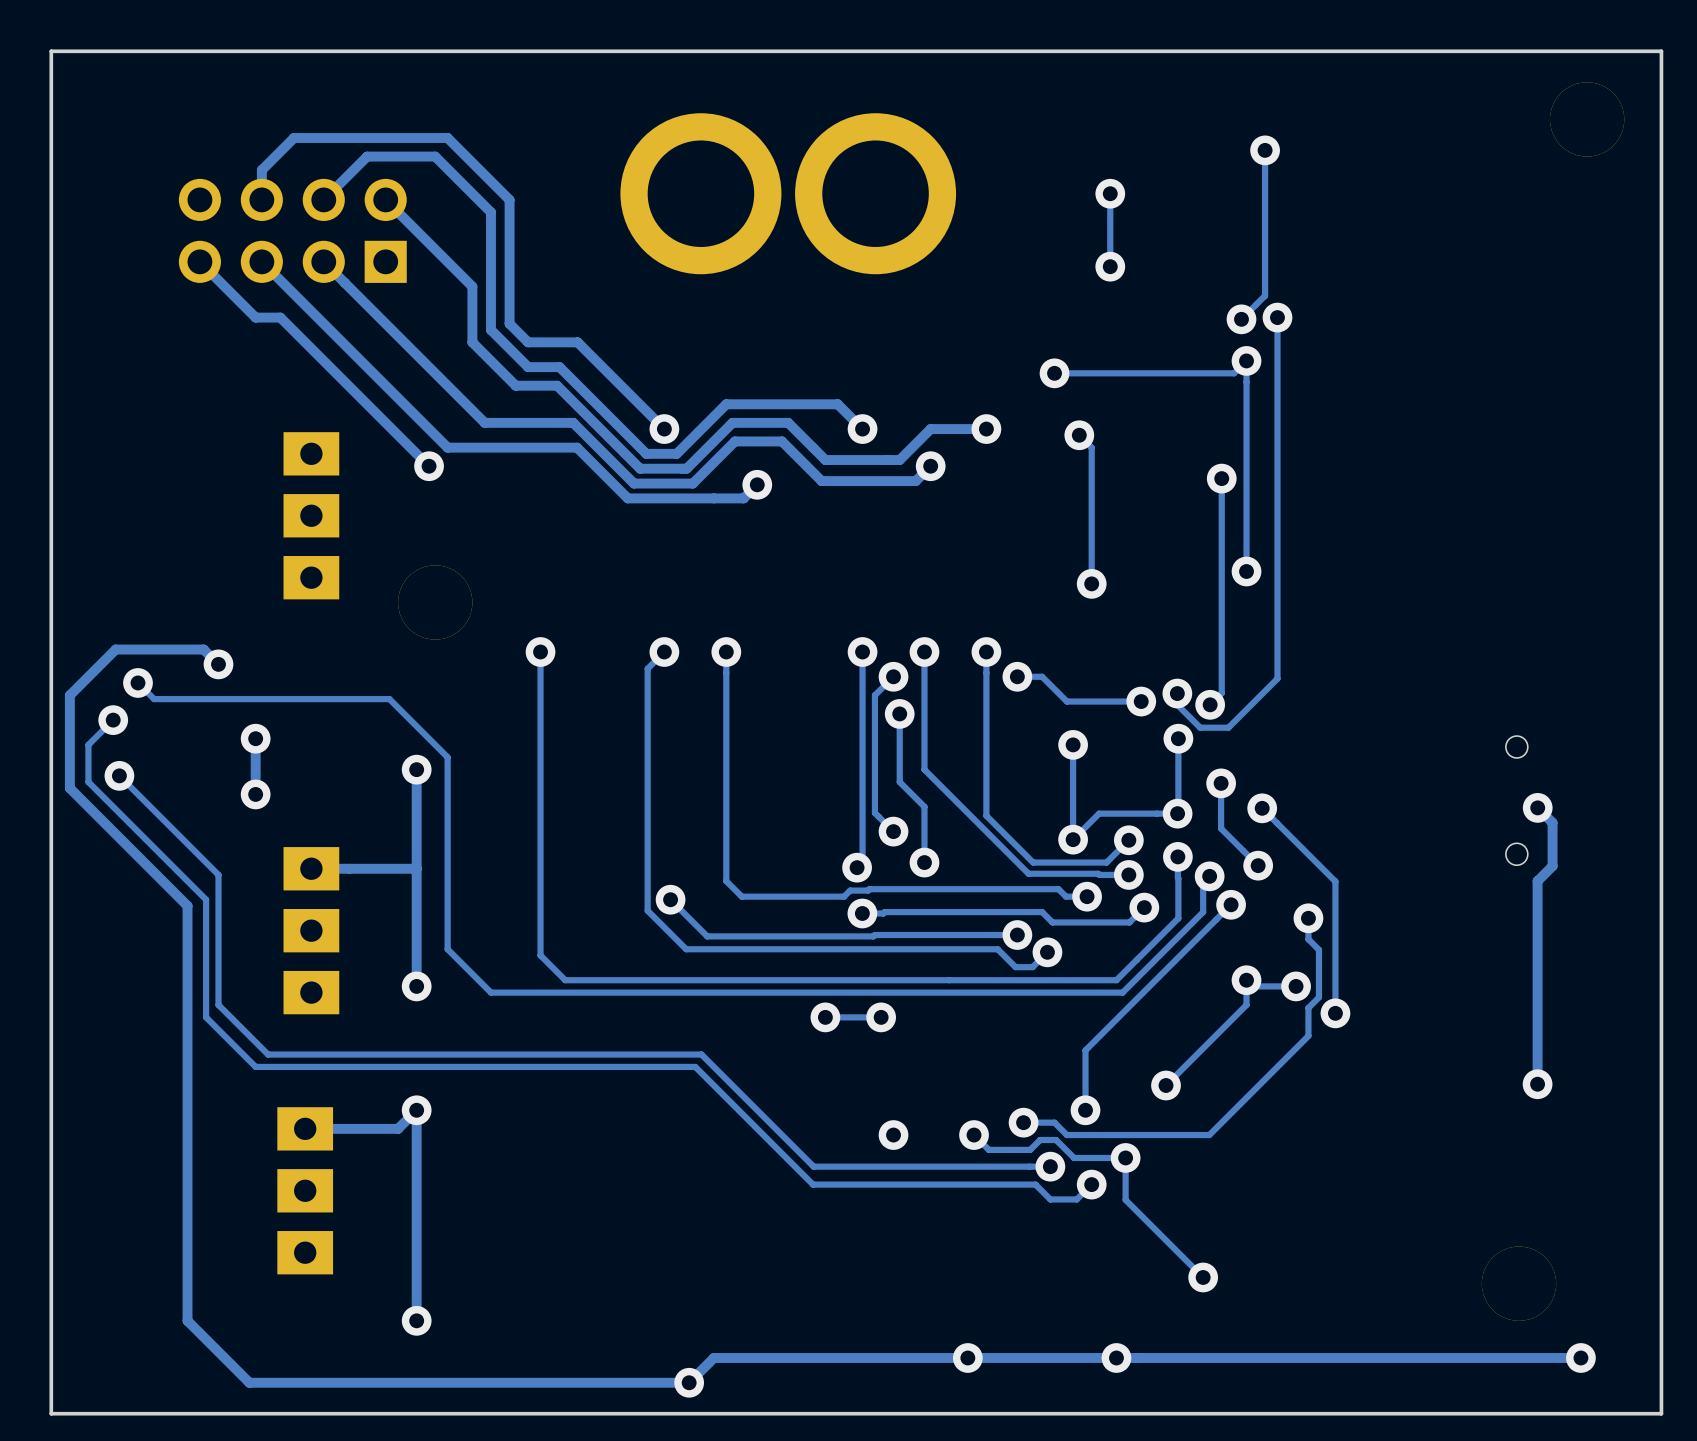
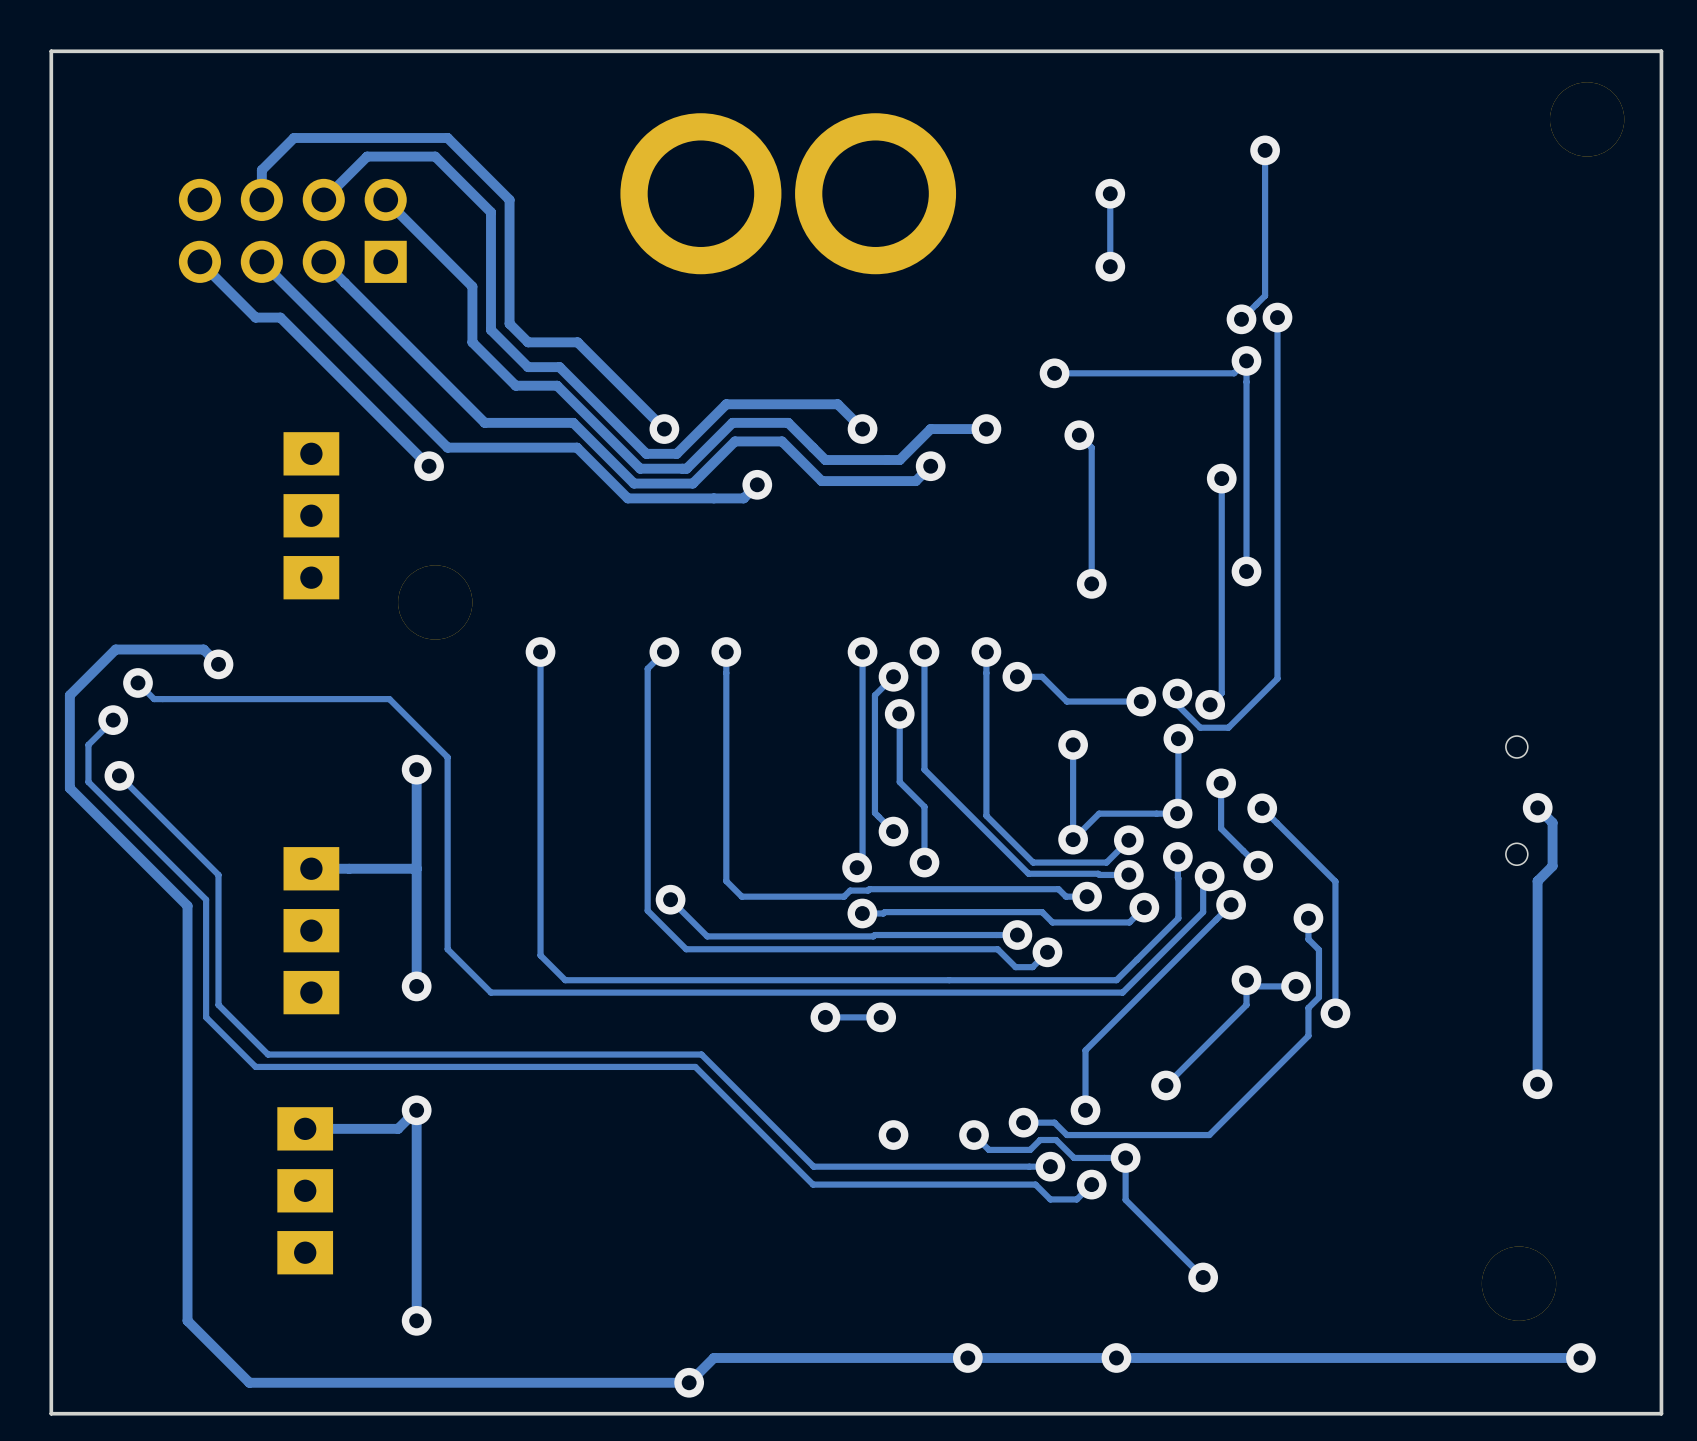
track: (255, 738) (255, 794) -> none
via: (255, 738) -> none
via: (255, 794) -> none

